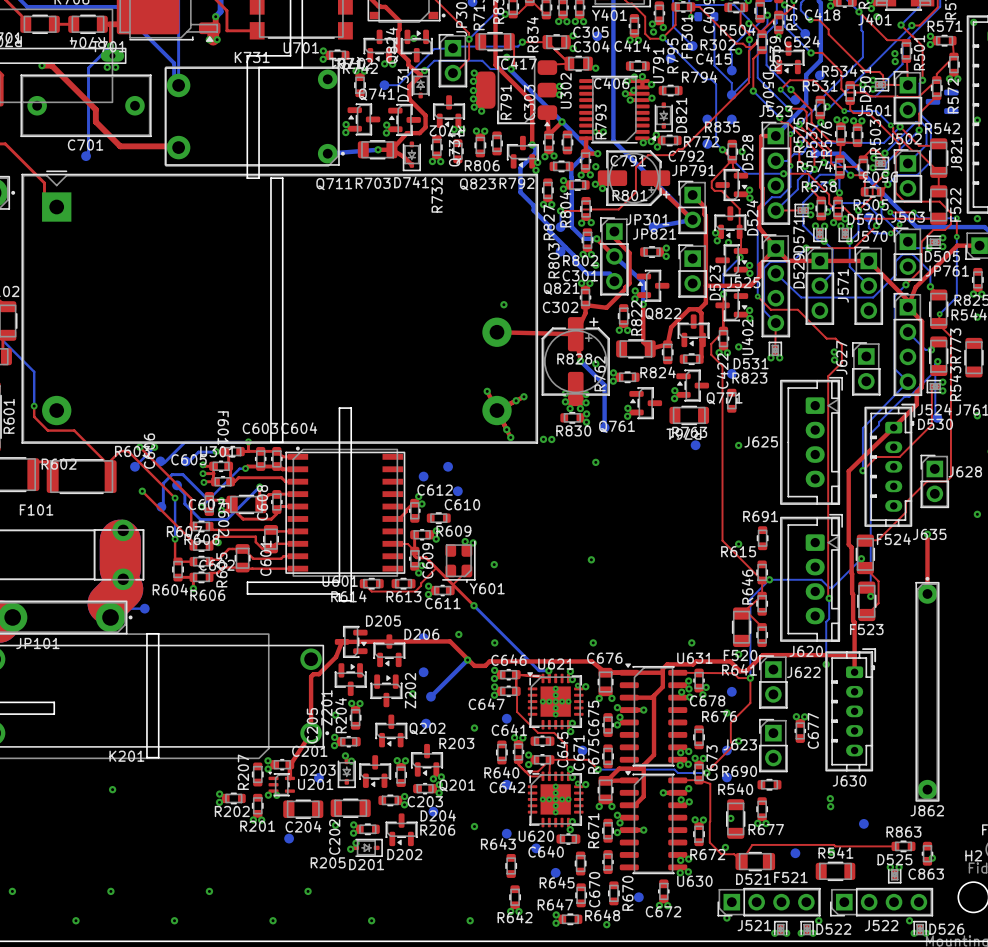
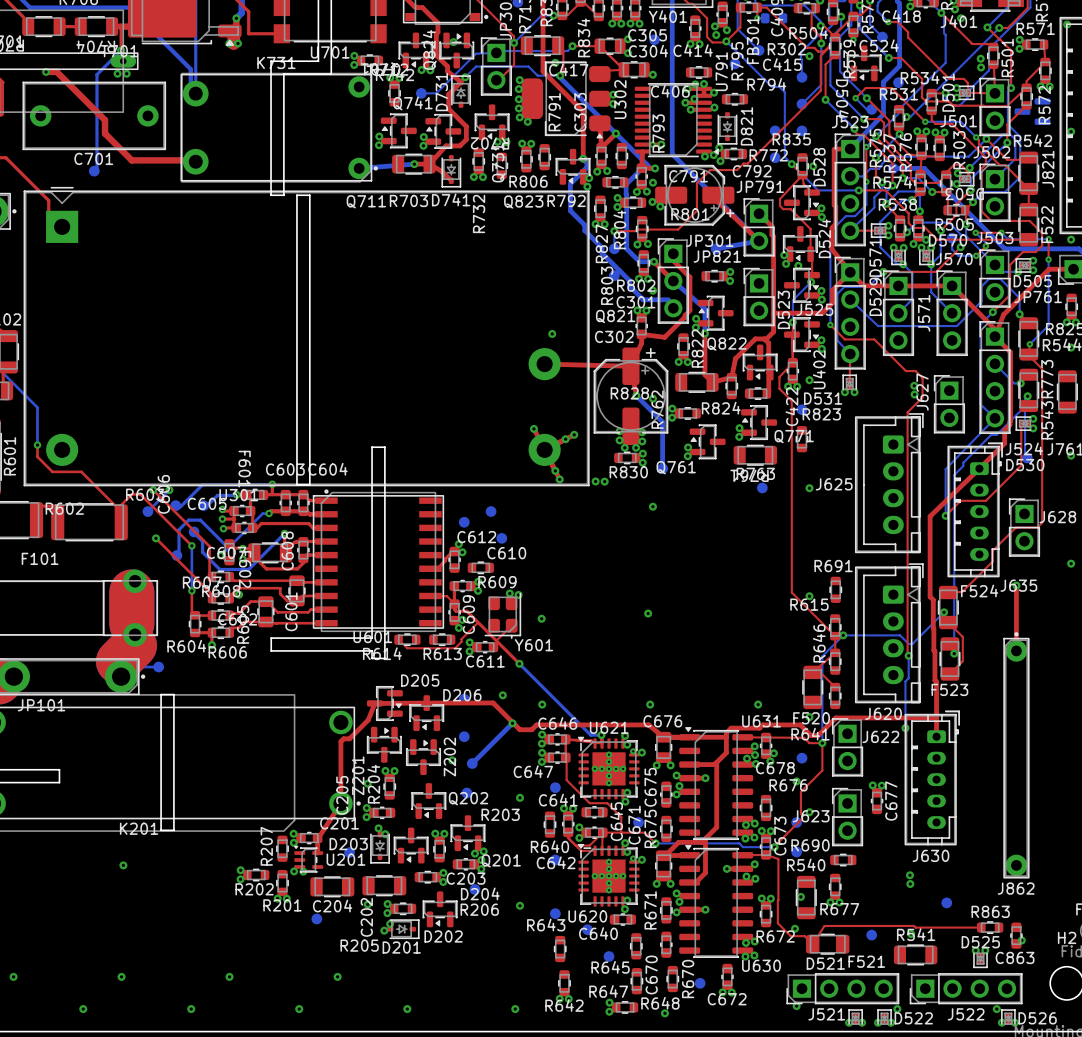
bottom track: (714, 16) (714, 65) (731, 83) (731, 94) -> none

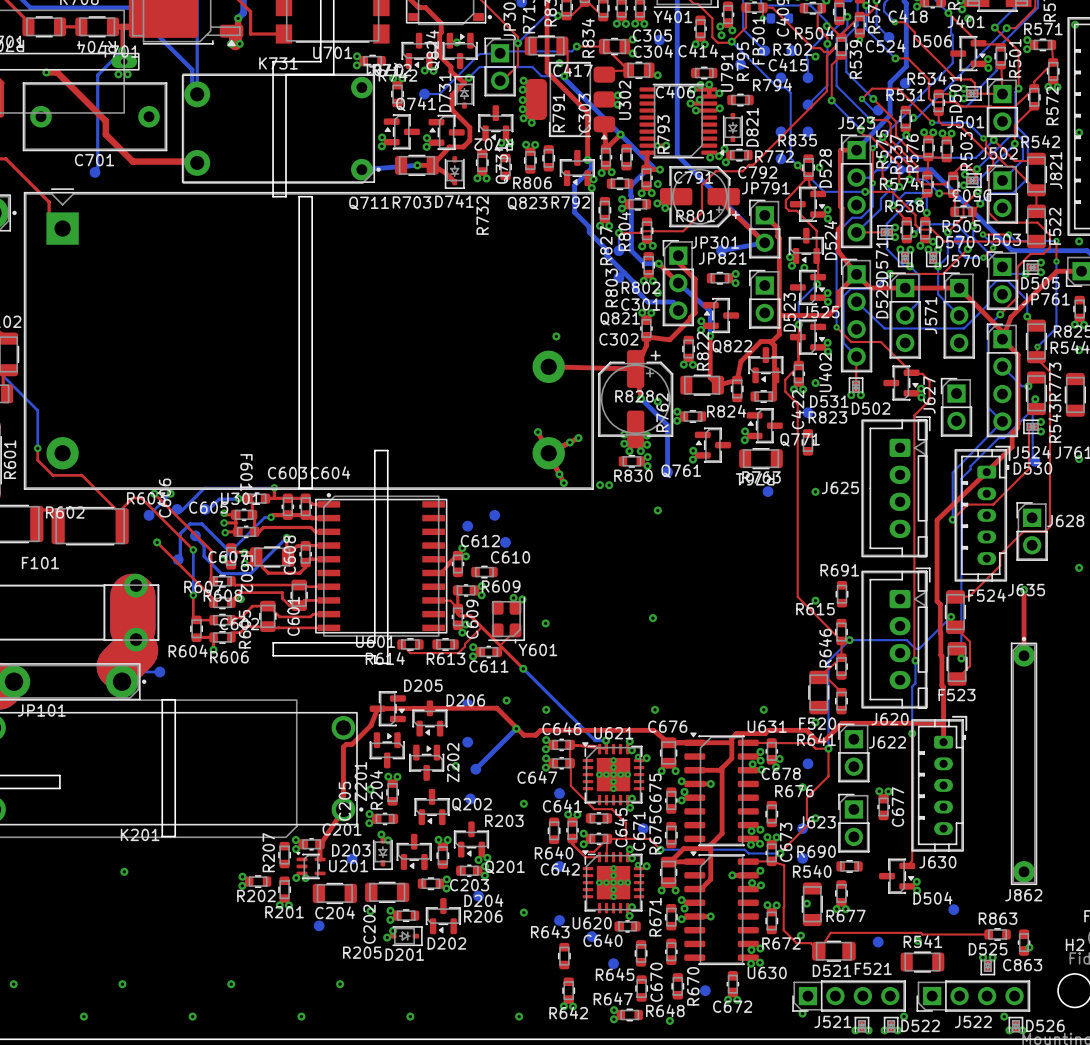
part: none -> (791, 50)
D506: none -> (968, 53)
D504 rotation: 0° (864, 63) -> 90° counterclockwise (897, 876)
D504 position: (864, 63) -> (897, 876)
part: none -> (780, 77)
part: (1032, 111) -> none
D502: none -> (901, 383)
top track: none -> (912, 733) (912, 861) (907, 865)

